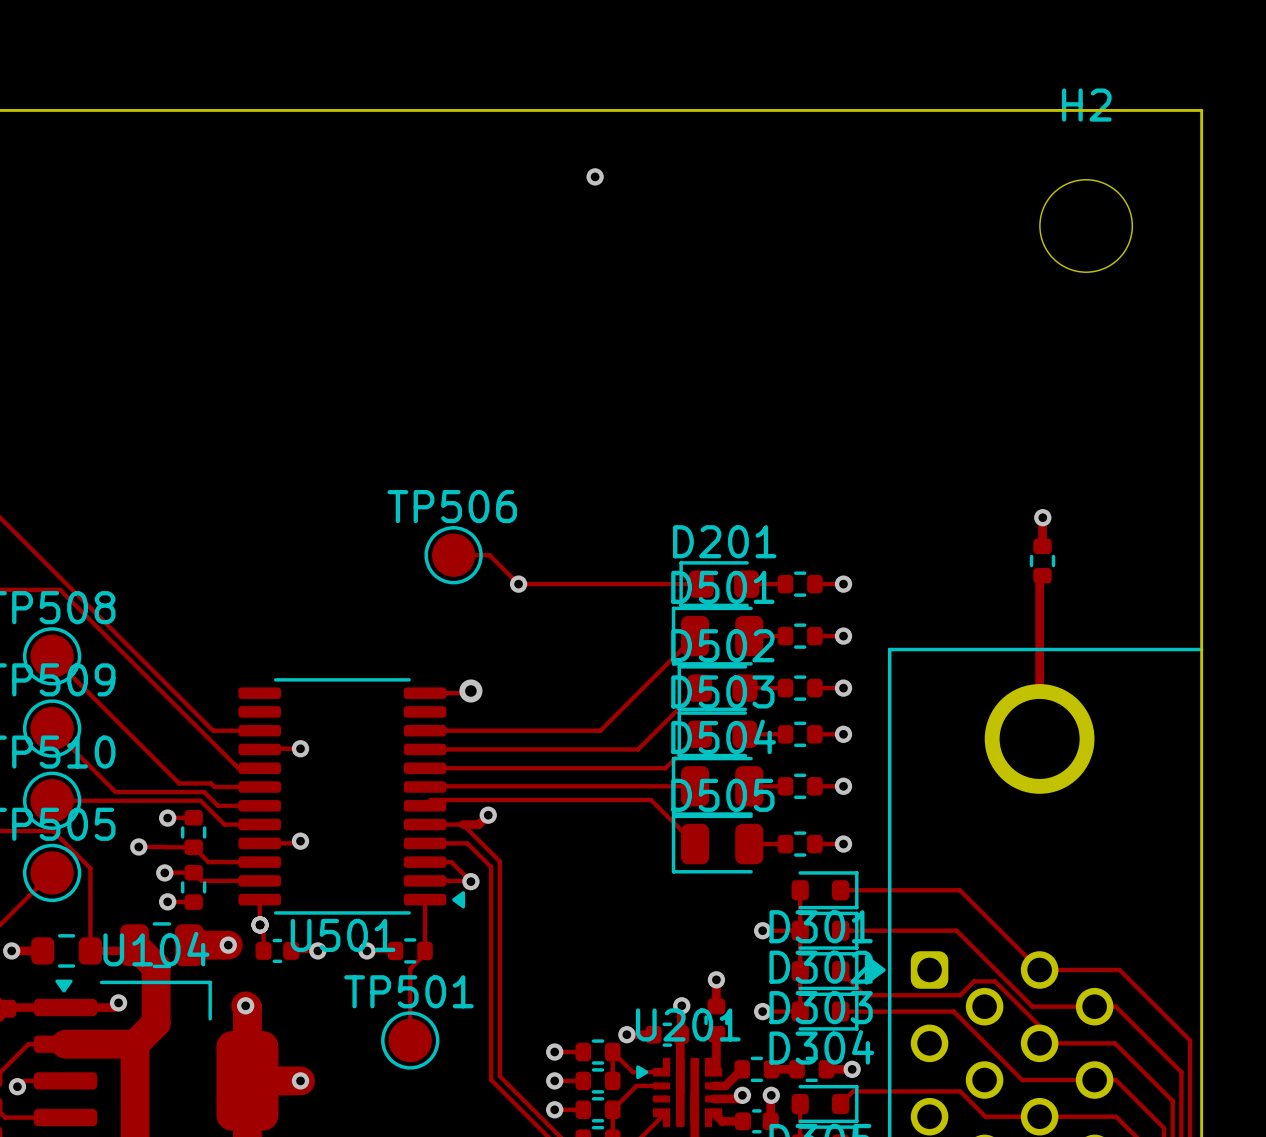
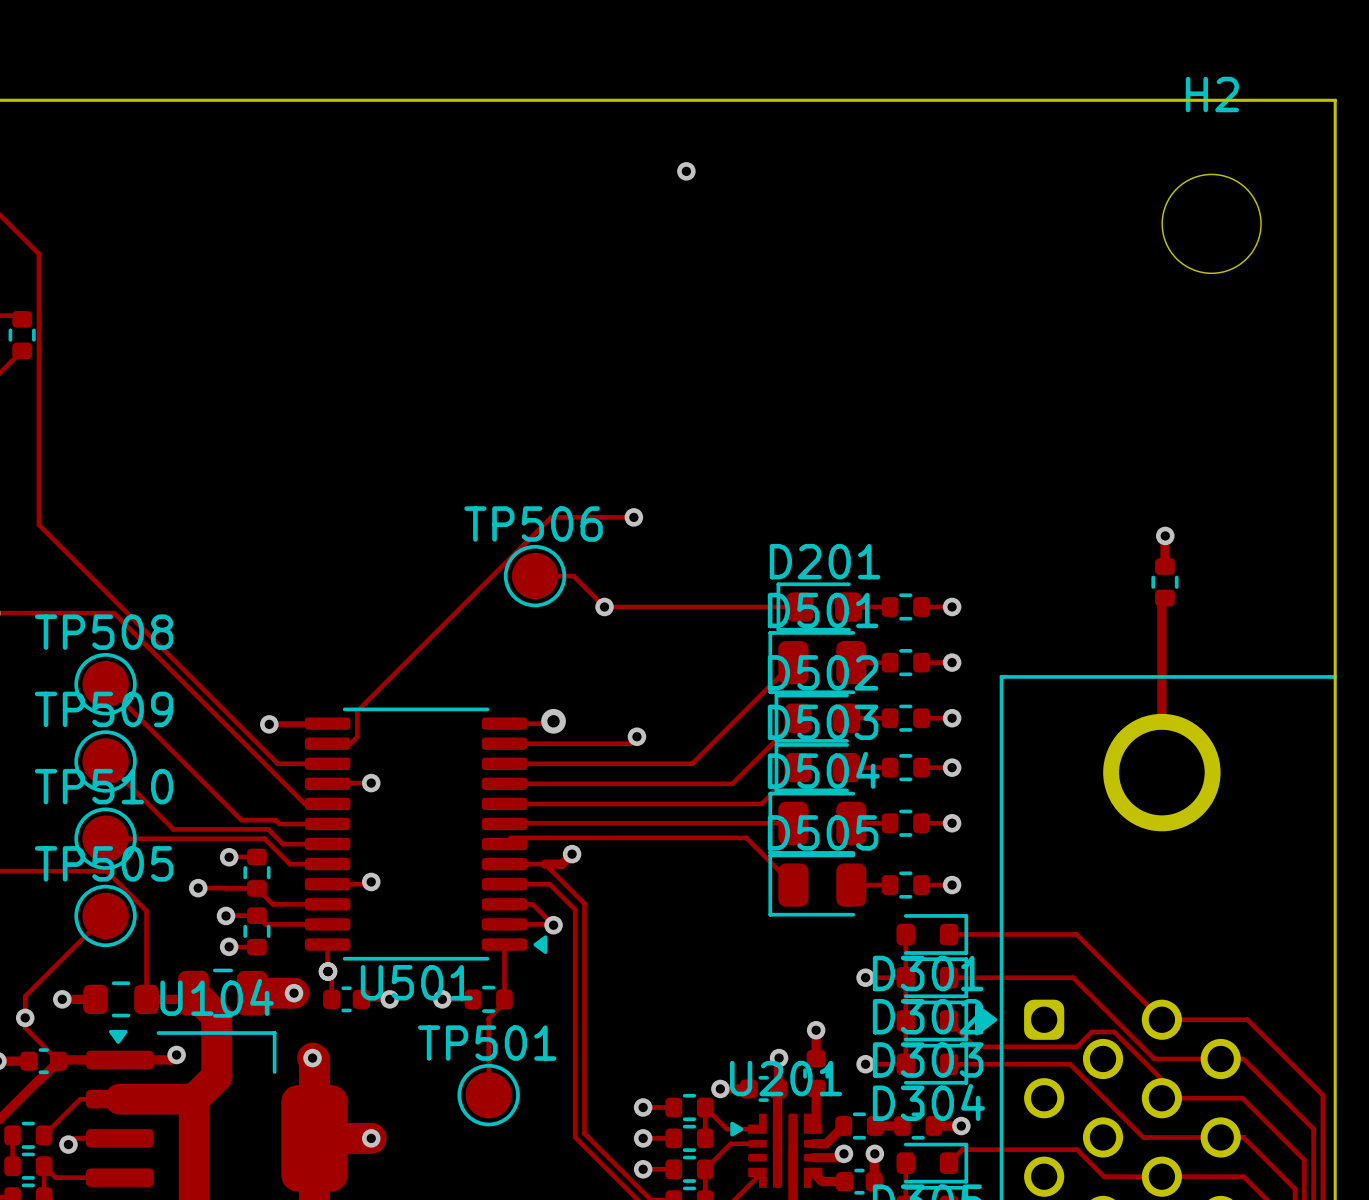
track: none -> (633, 517) (551, 517) (357, 711) (357, 736) (350, 743) (327, 743)
via: none -> (633, 517)
via: none -> (269, 724)
track: none -> (327, 723) (269, 724)
track: none -> (636, 736) (630, 743) (504, 743)
via: none -> (636, 736)

